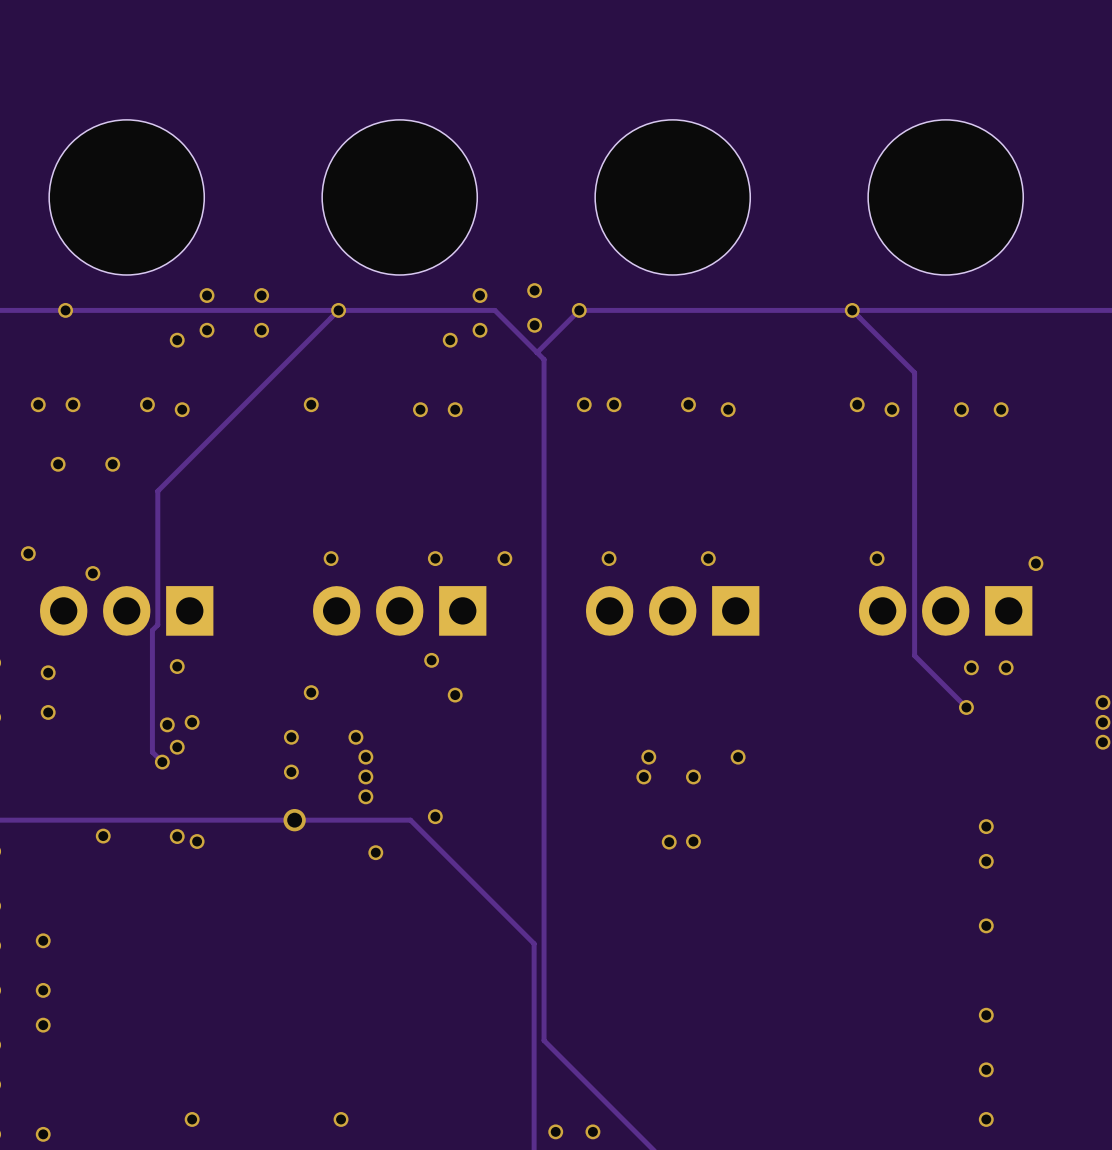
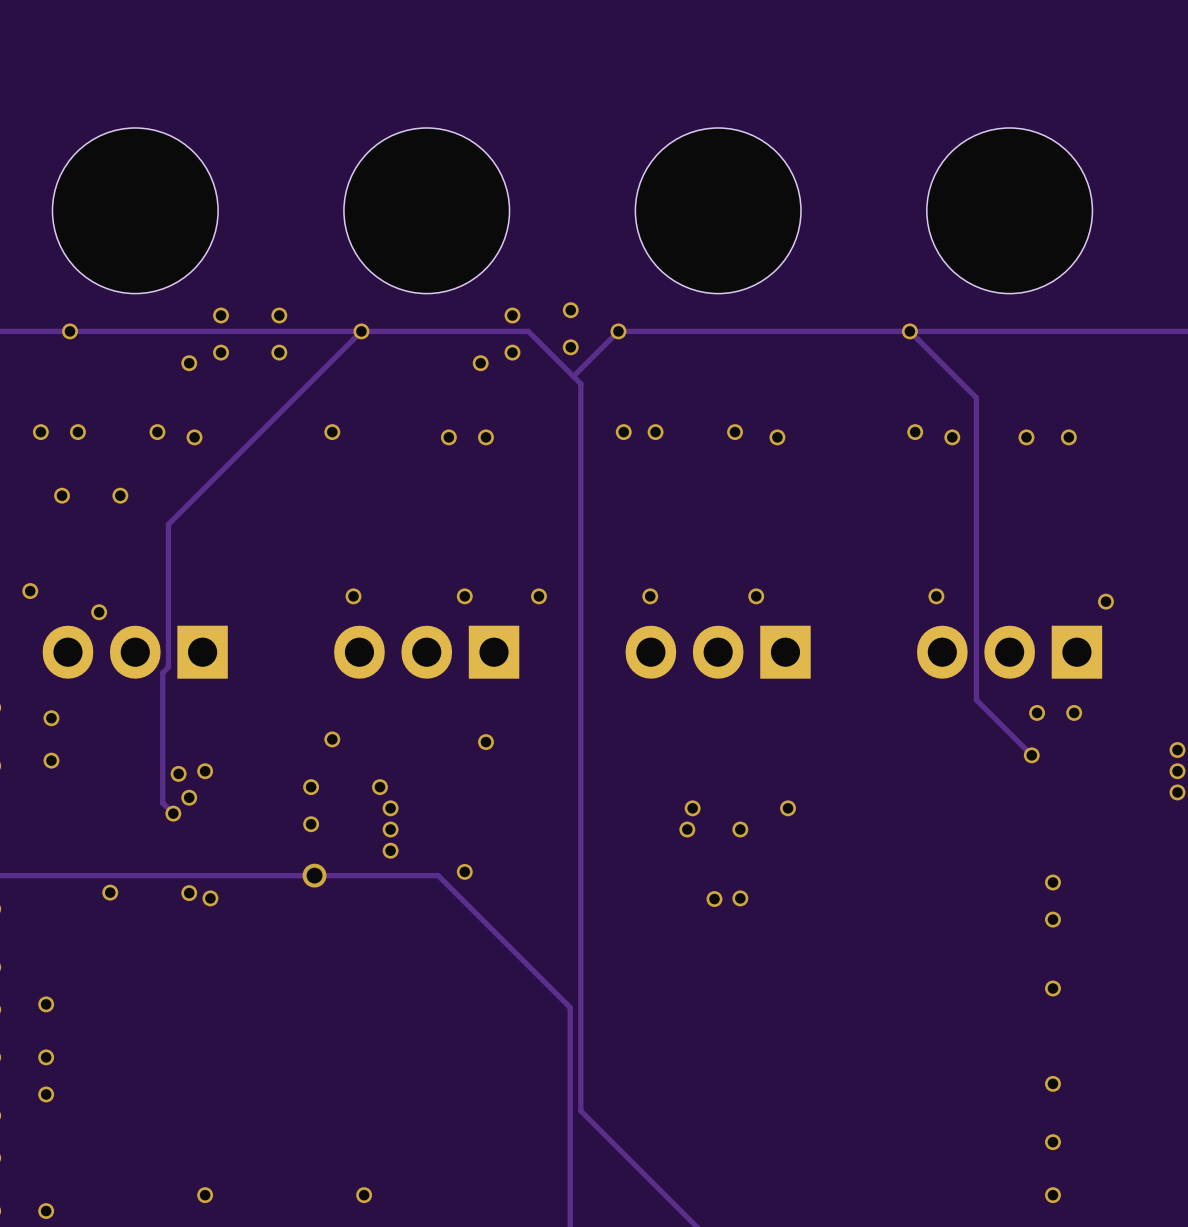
via: (431, 660) -> none
via: (177, 666) -> none
via: (375, 852) -> none
via: (555, 1131) -> none
via: (592, 1131) -> none

